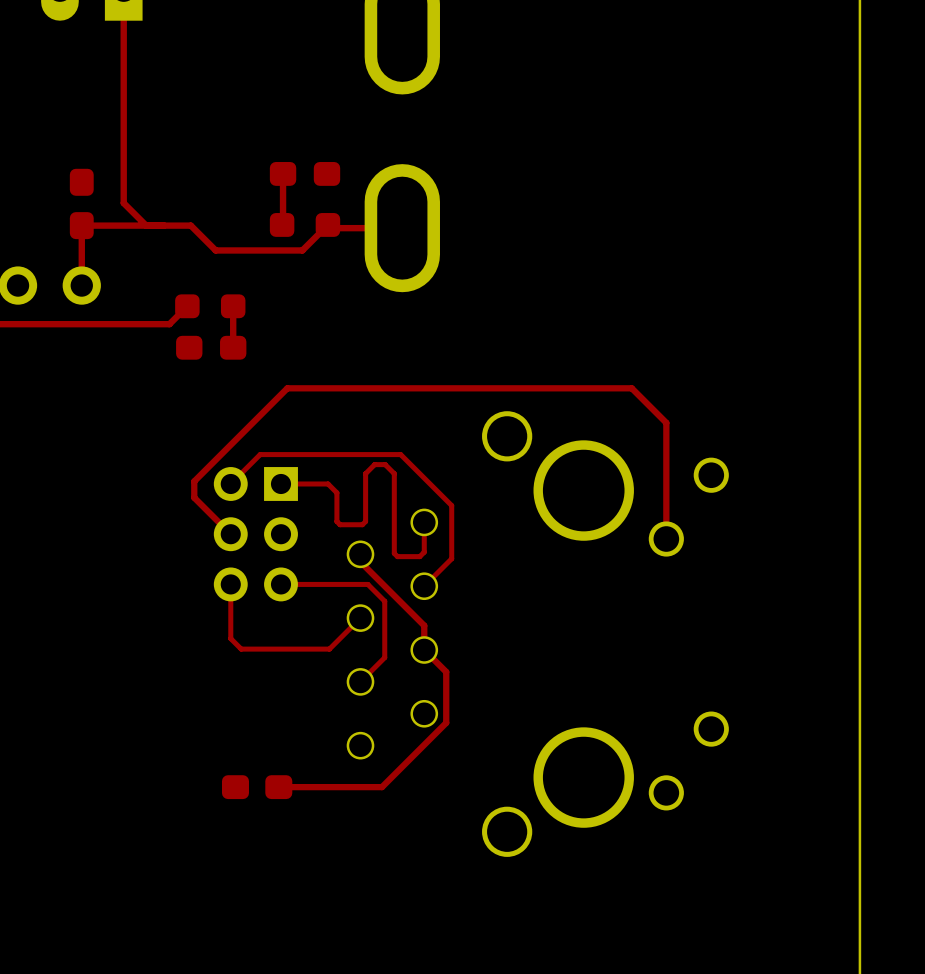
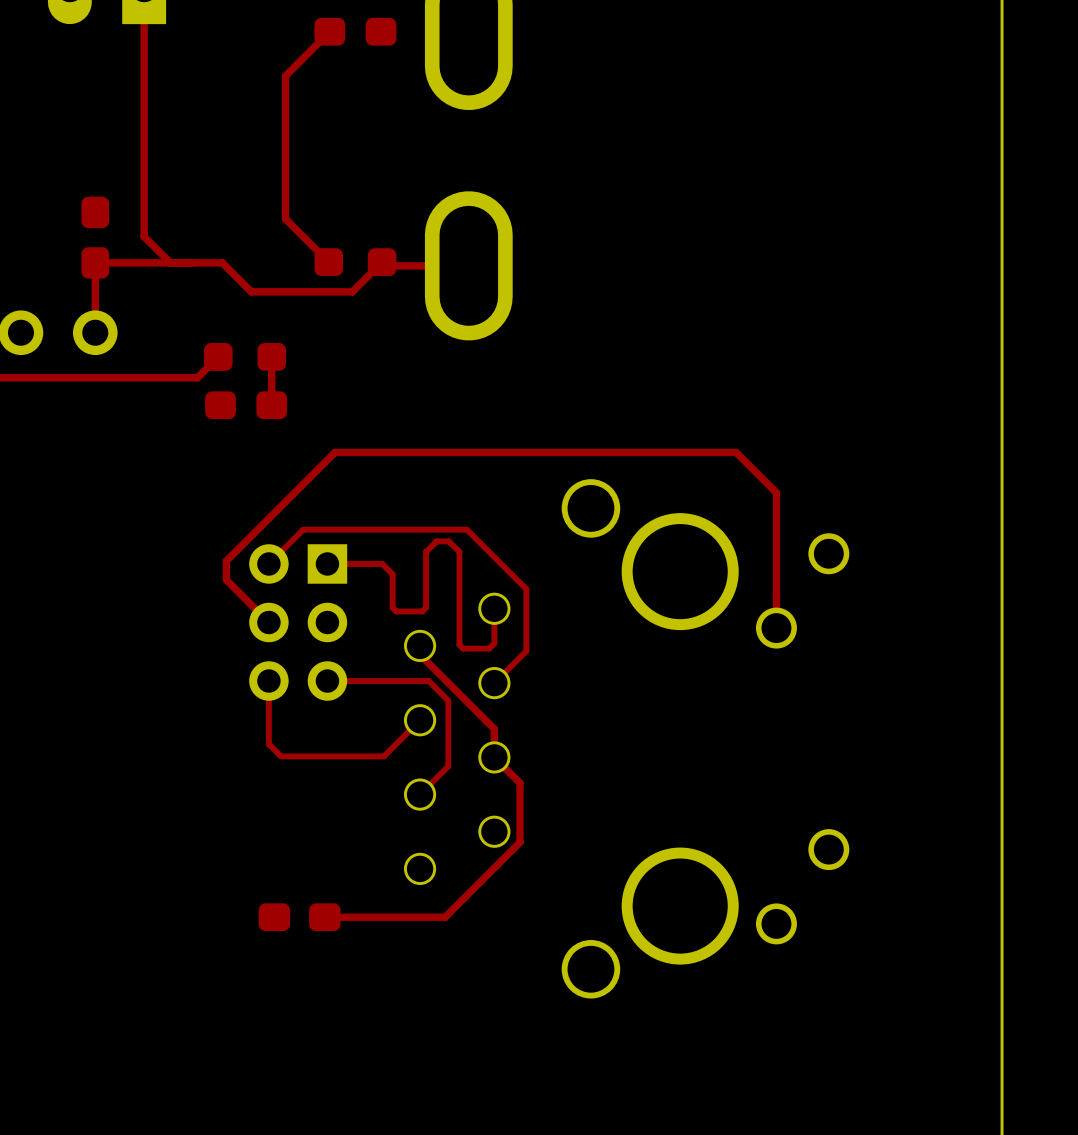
top track: (283, 173) (282, 224) -> (329, 31) (285, 76) (285, 218) (328, 262)
part position: (305, 173) -> (355, 31)

